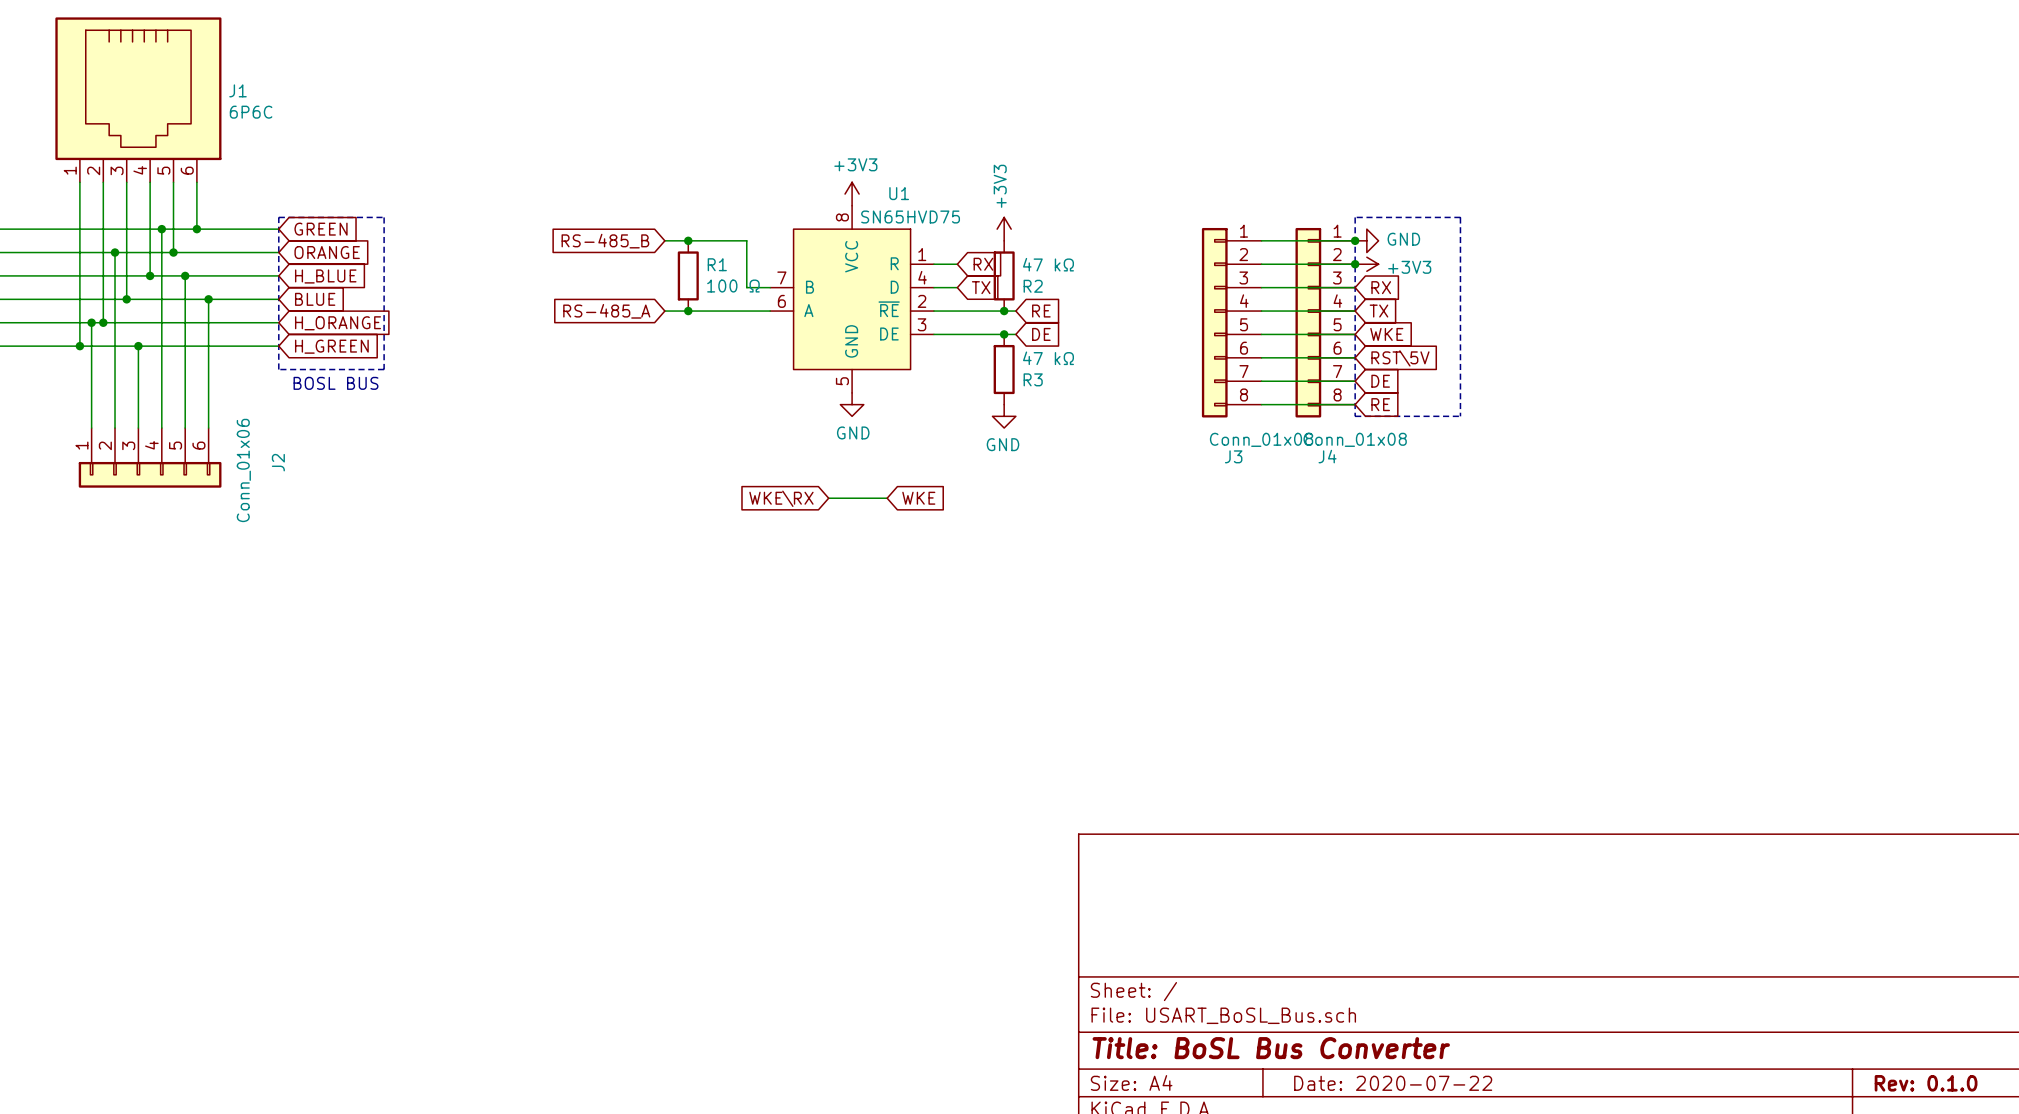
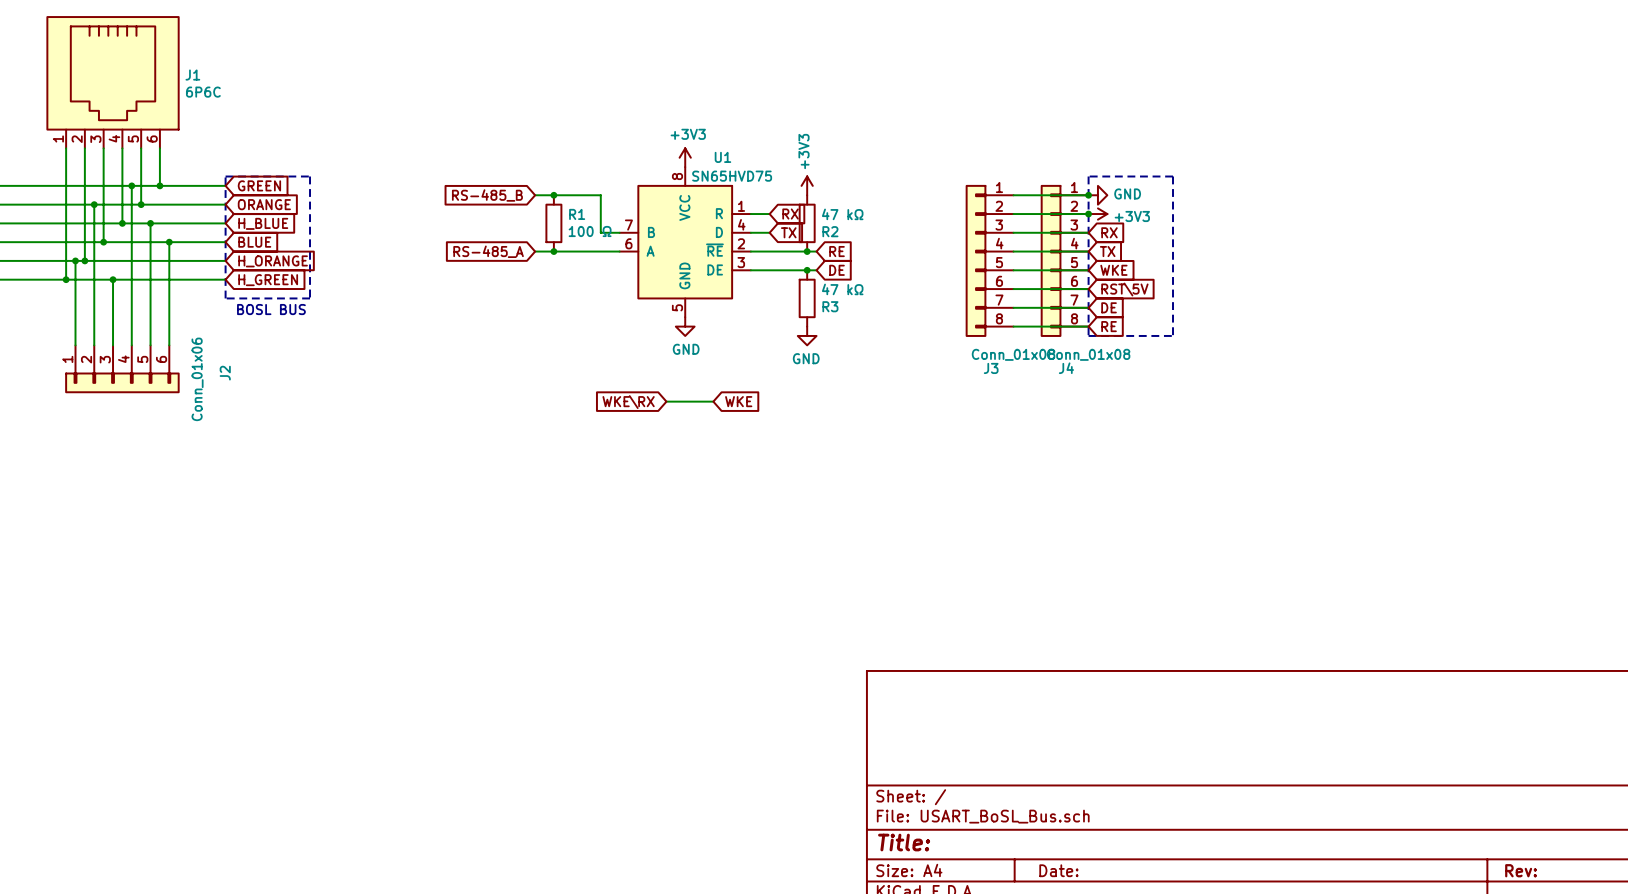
title block: Title: BoSL Bus Converter (1271, 1048) -> Title: (904, 842)
title block: Date: 2020-07-22 (1393, 1083) -> Date: (1058, 870)
title block: Rev: 0.1.0 (1926, 1083) -> Rev: (1521, 870)

